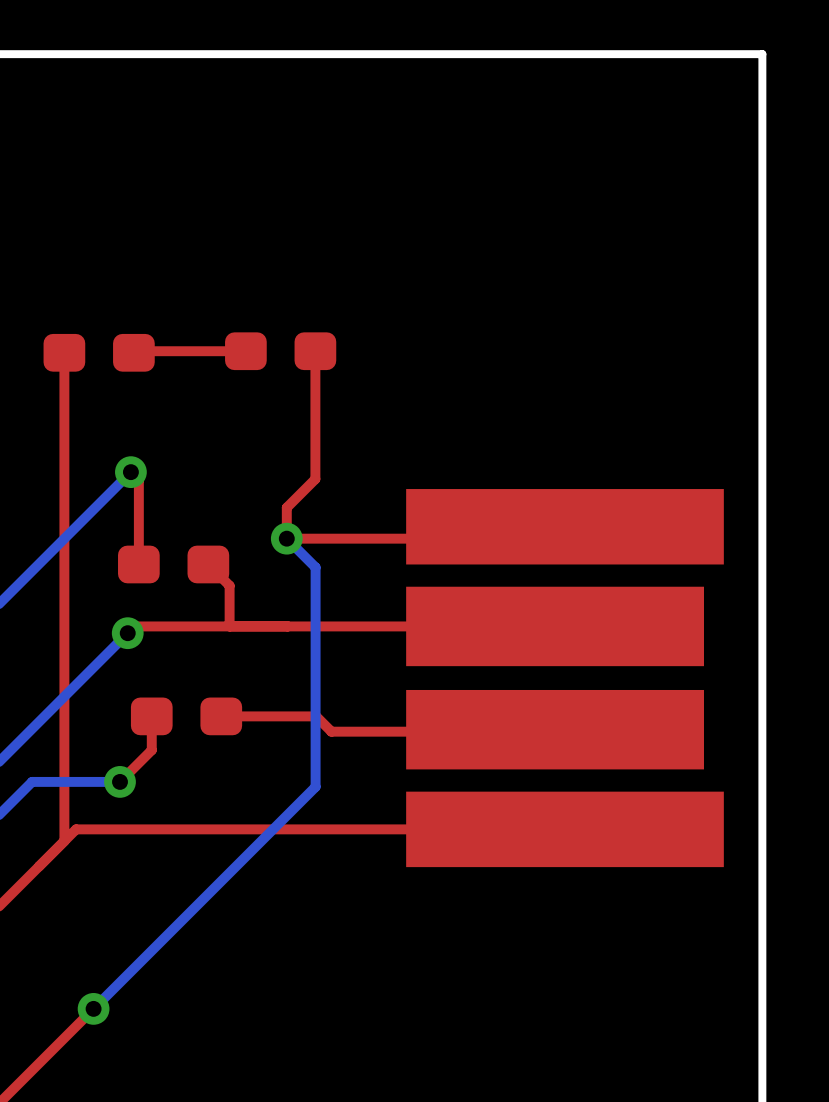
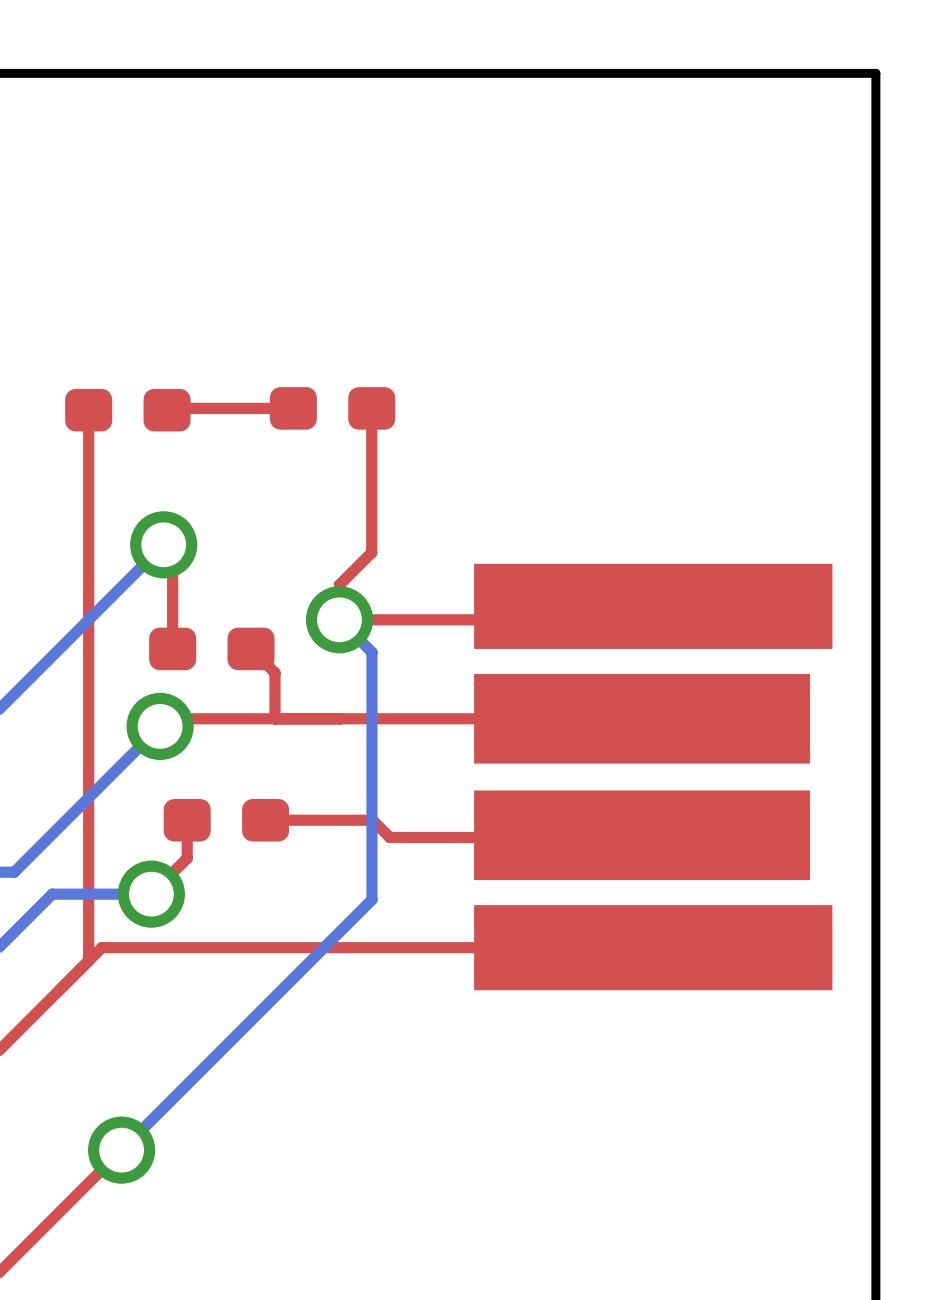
via size: [115, 456, 147, 489] -> [130, 511, 198, 579]
via size: [270, 522, 303, 555] -> [305, 586, 374, 654]
via size: [111, 617, 144, 650] -> [126, 692, 194, 761]
via size: [104, 766, 136, 798] -> [117, 860, 185, 928]
via size: [77, 992, 110, 1025] -> [88, 1116, 156, 1184]

